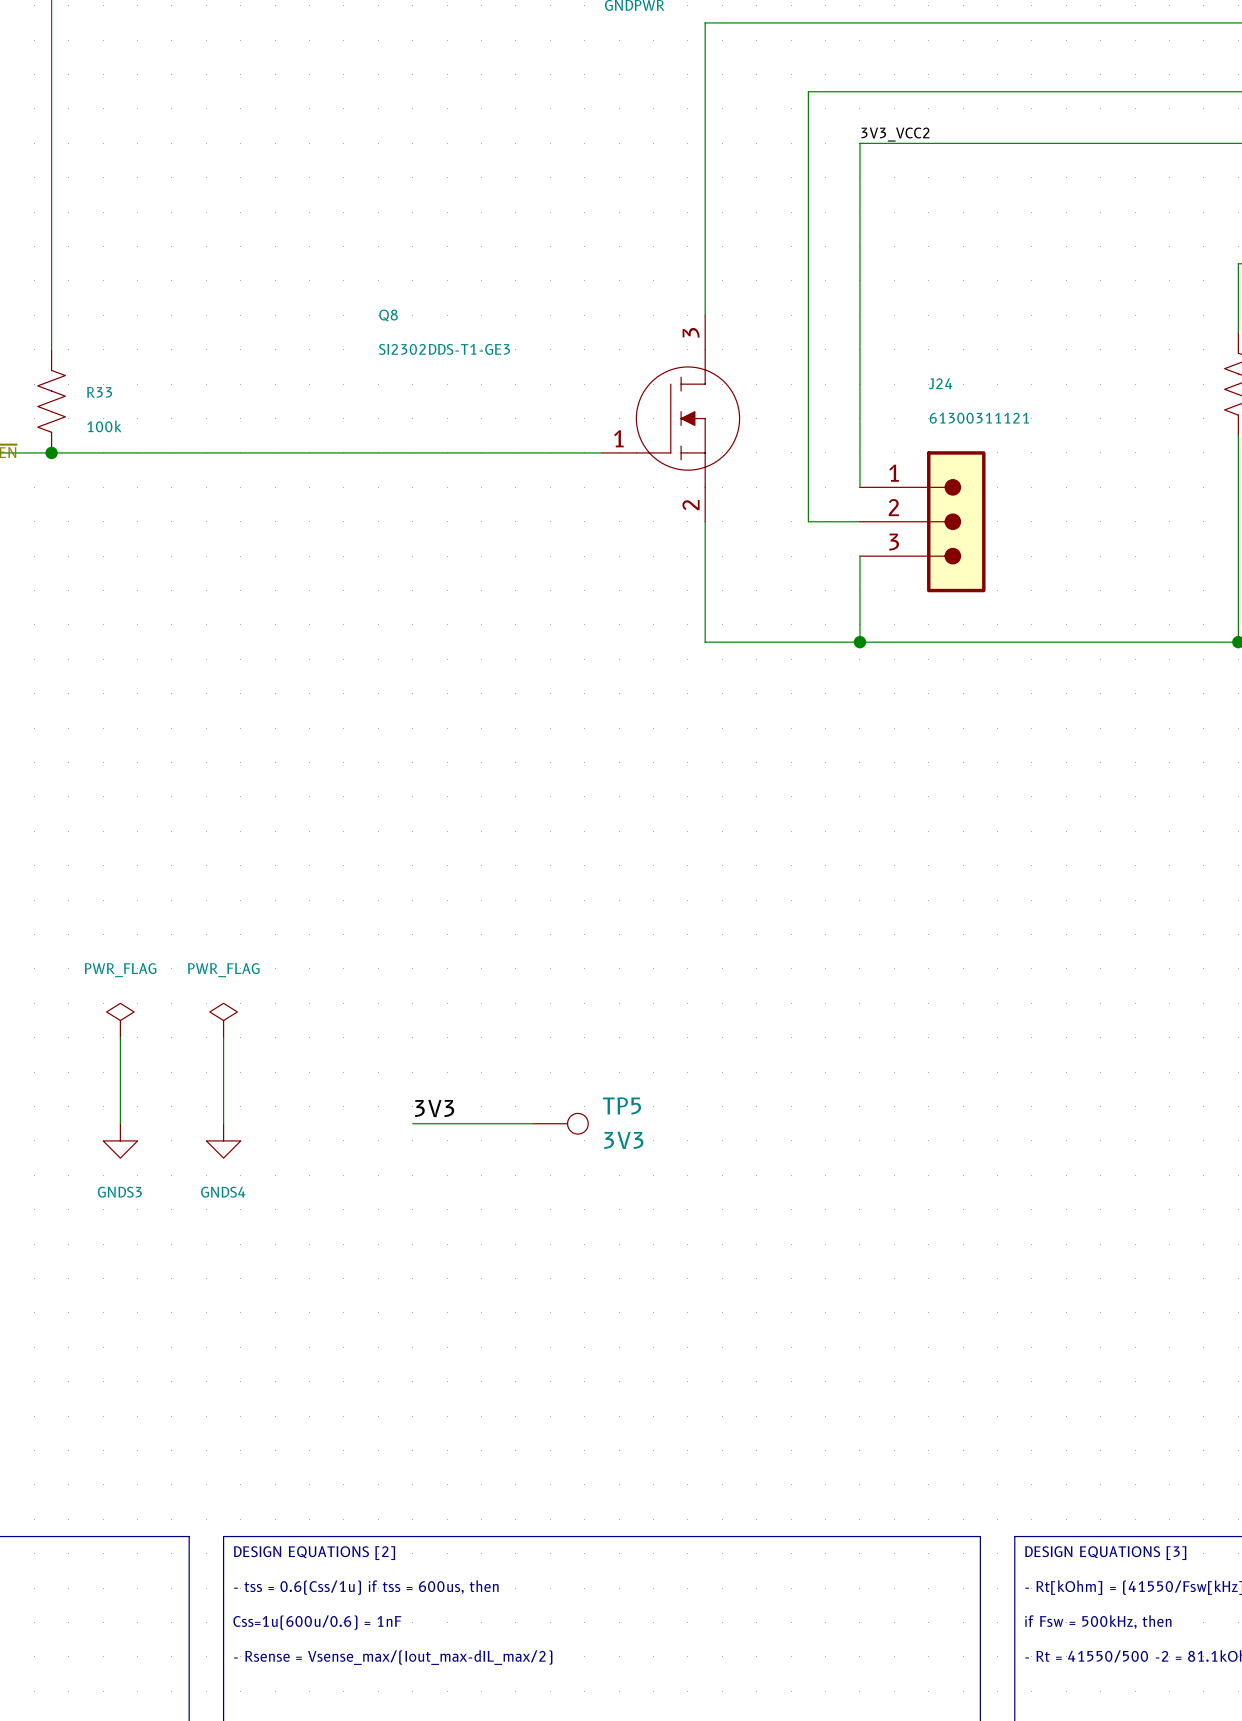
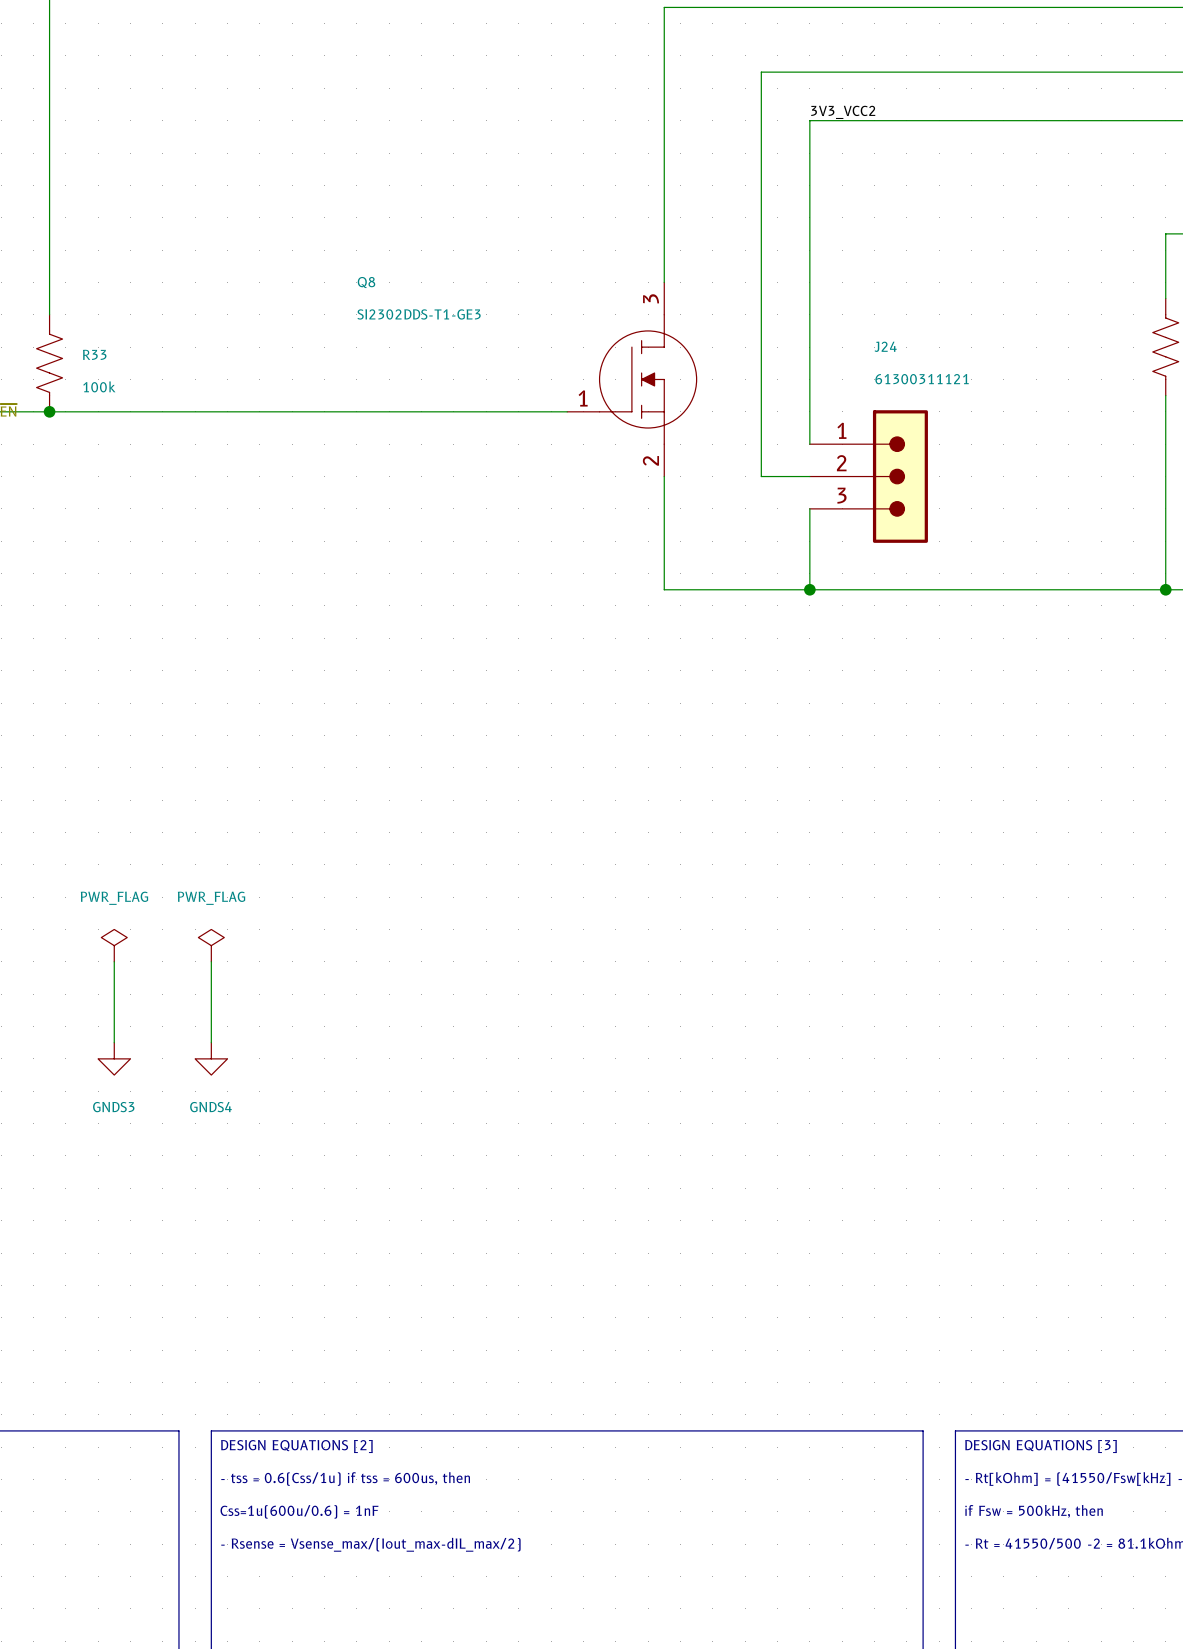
label: 3V3 (434, 1108) -> none
wire: (412, 1123) (533, 1123) -> none
TP5: 3V3 (560, 1123) -> none

